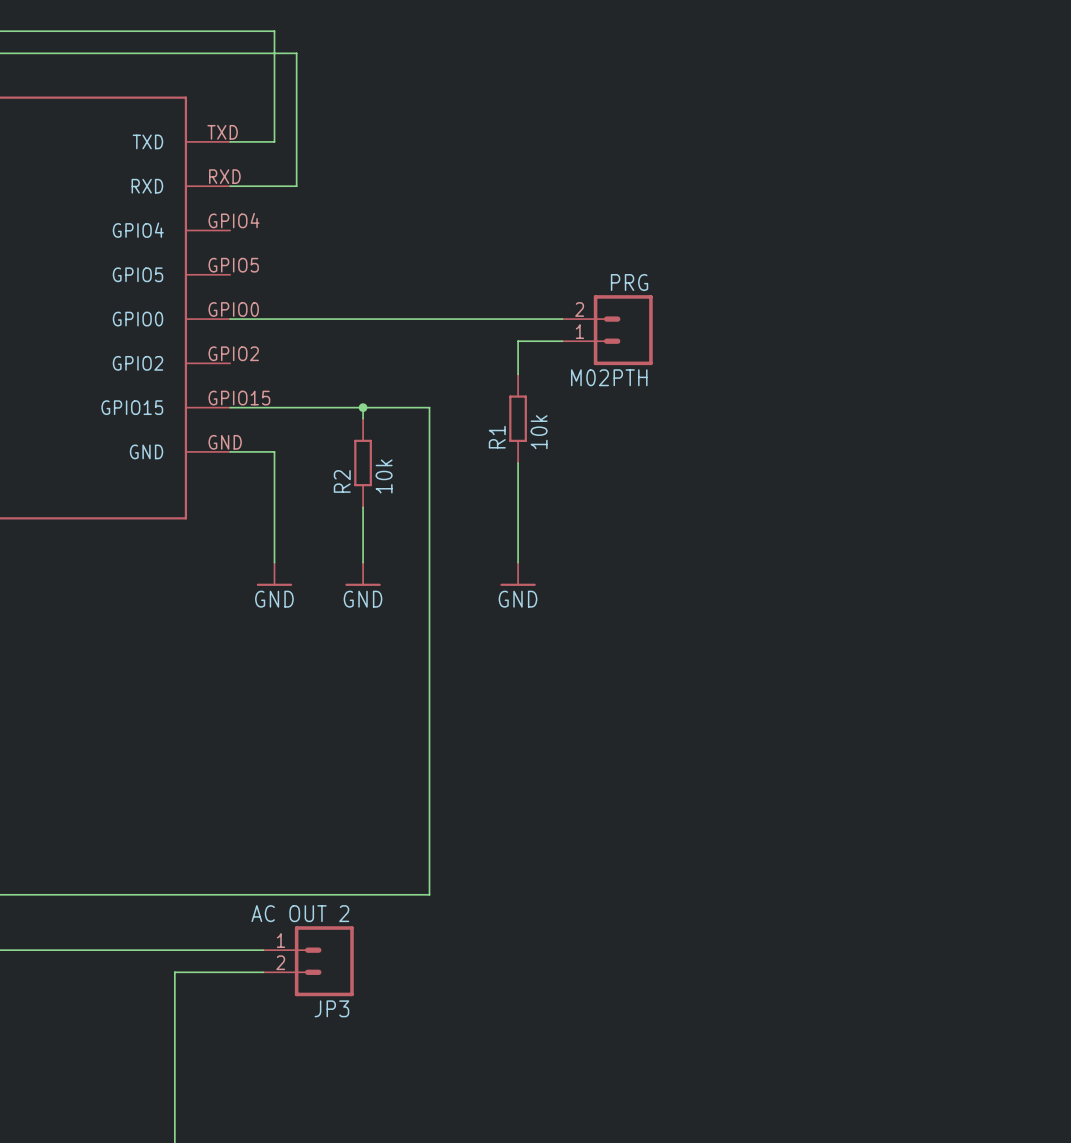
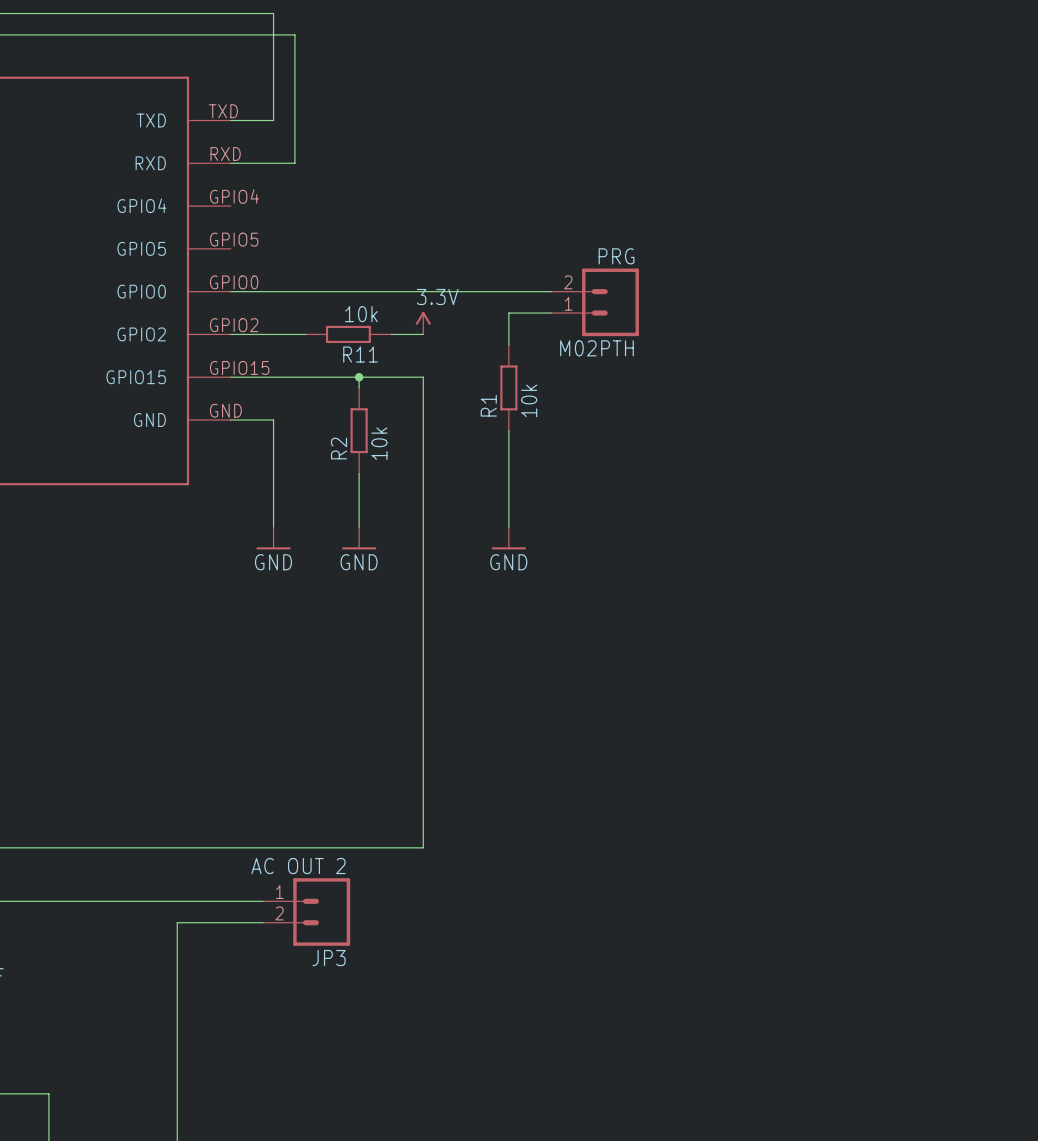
power symbol: none -> 3.3V (423, 323)
wire: none -> (230, 334) (305, 334)
R11: none -> 10k (348, 334)
wire: none -> (391, 334) (423, 334)

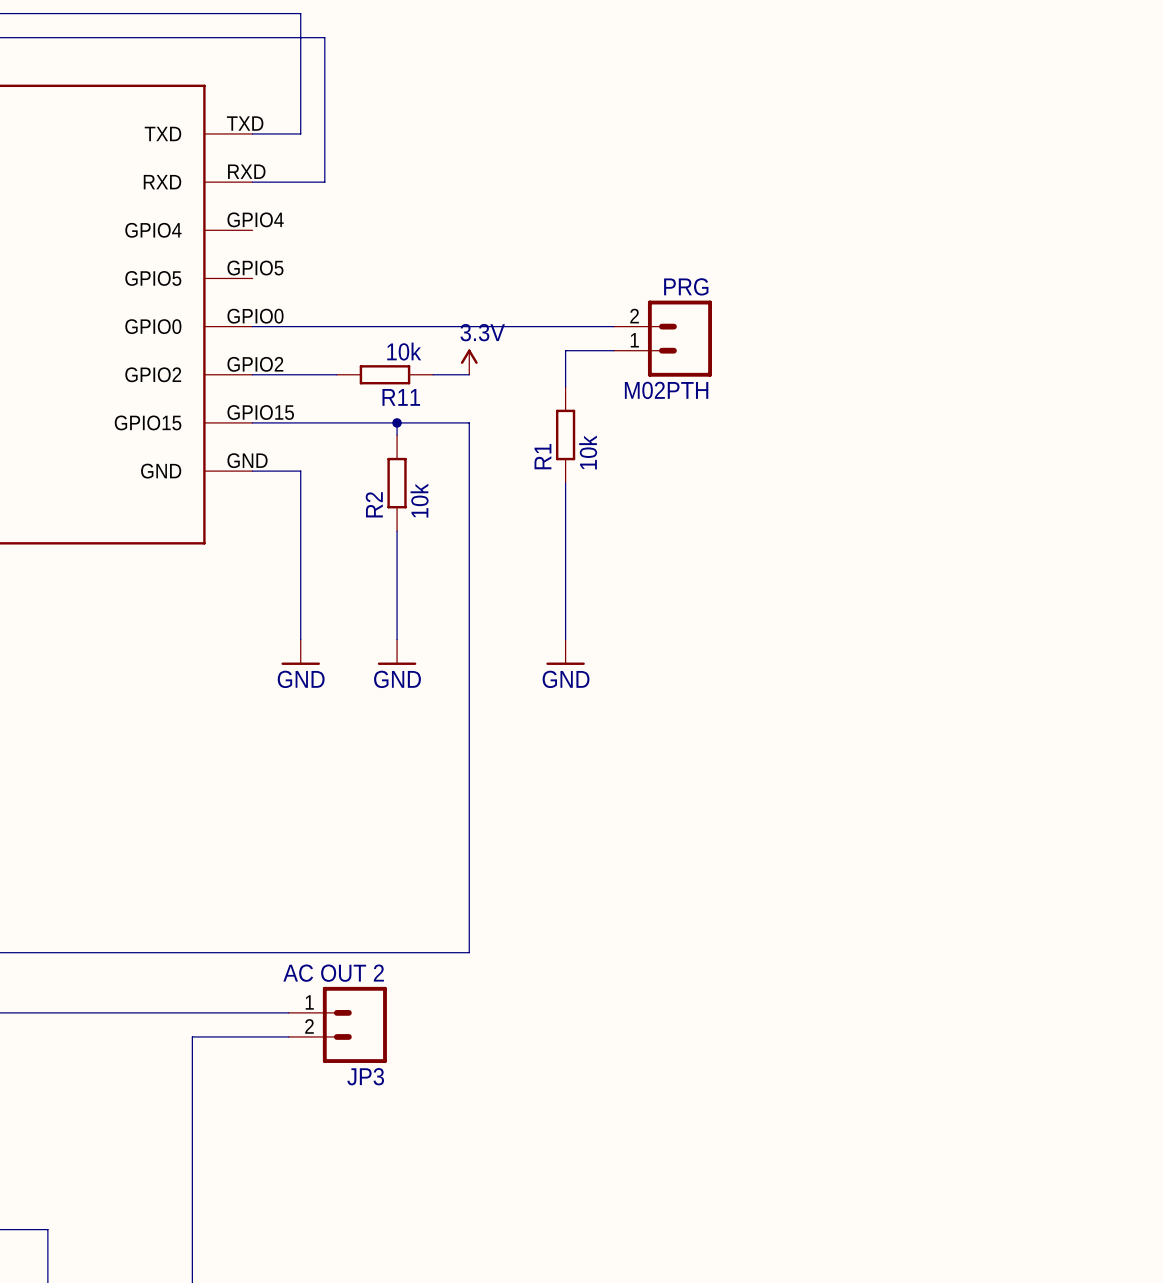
power symbol position: GND (273, 538) -> GND (300, 652)
power symbol position: GND (359, 538) -> GND (397, 652)
power symbol position: GND (508, 538) -> GND (565, 652)

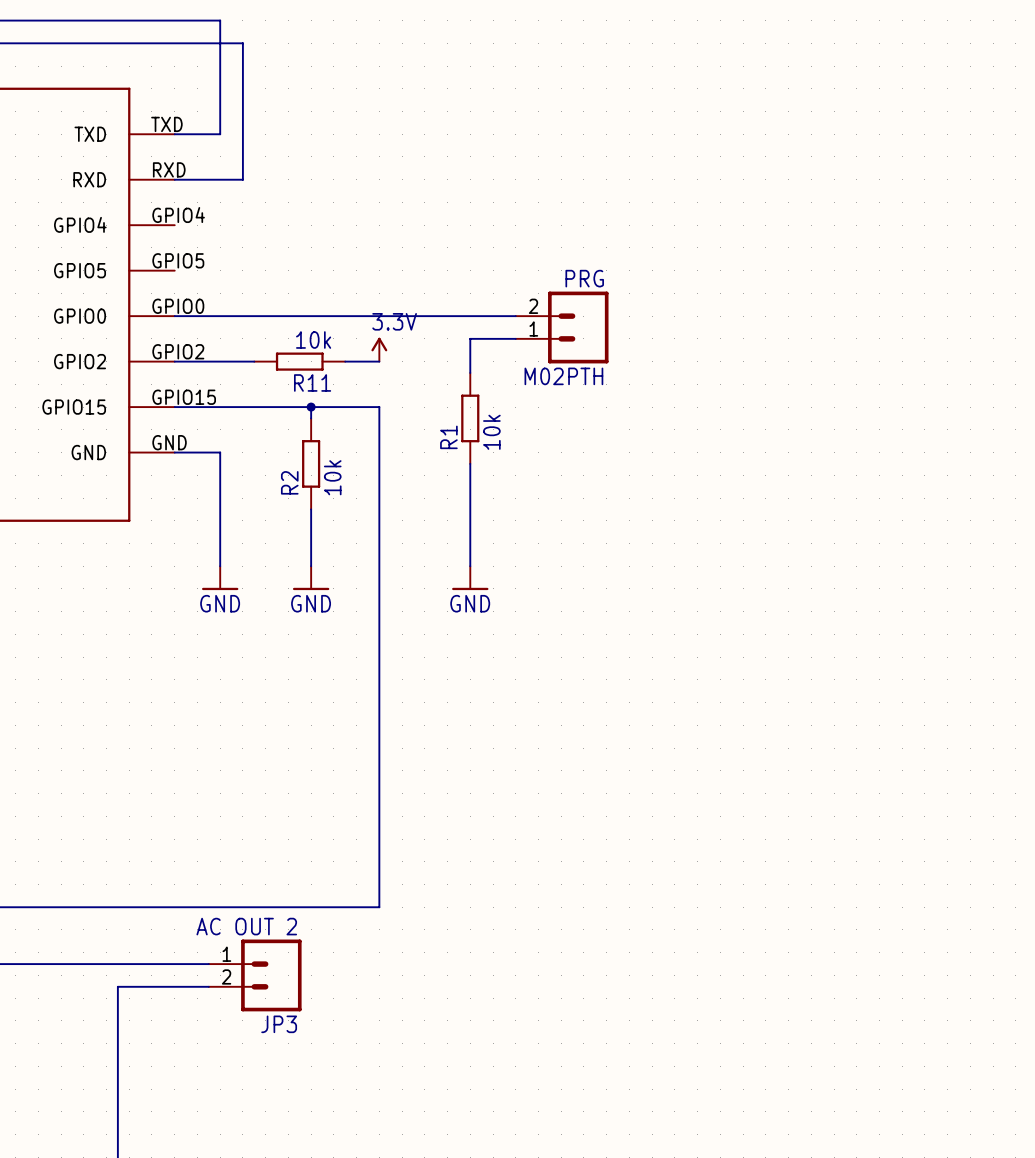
power symbol position: GND (300, 652) -> GND (220, 578)
power symbol position: GND (397, 652) -> GND (311, 578)
power symbol position: GND (565, 652) -> GND (470, 578)

